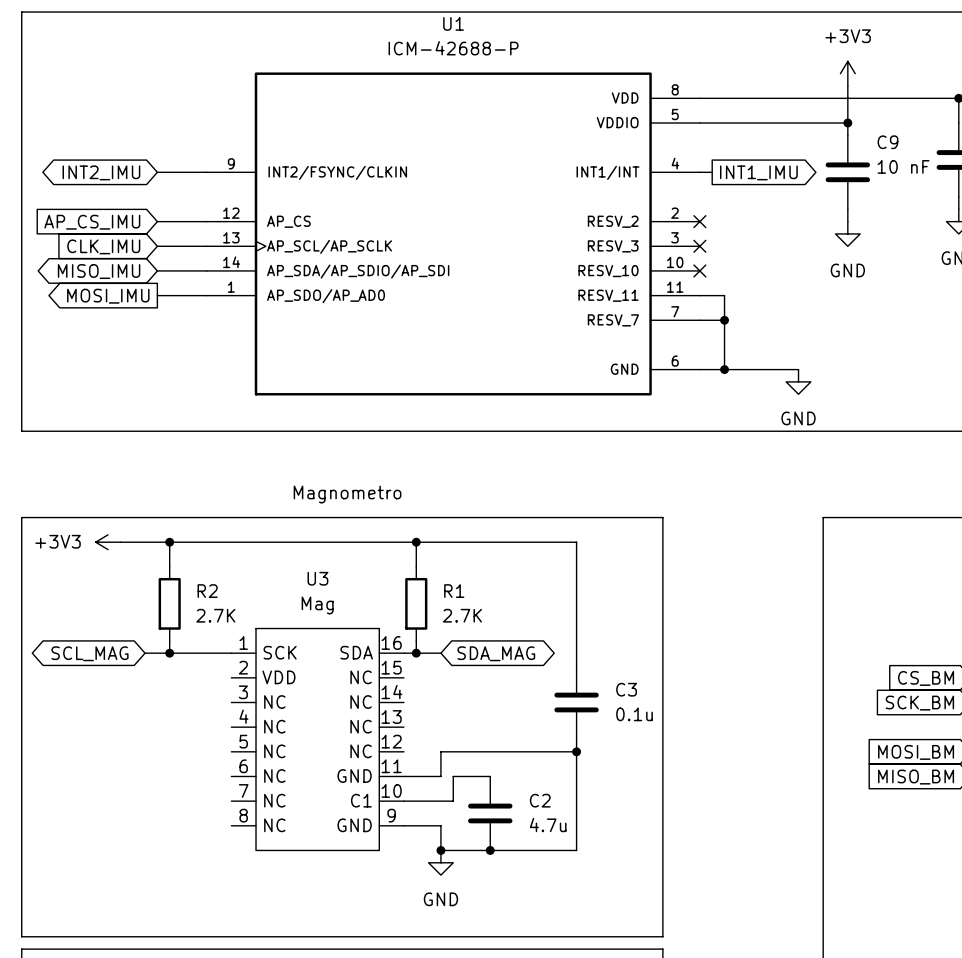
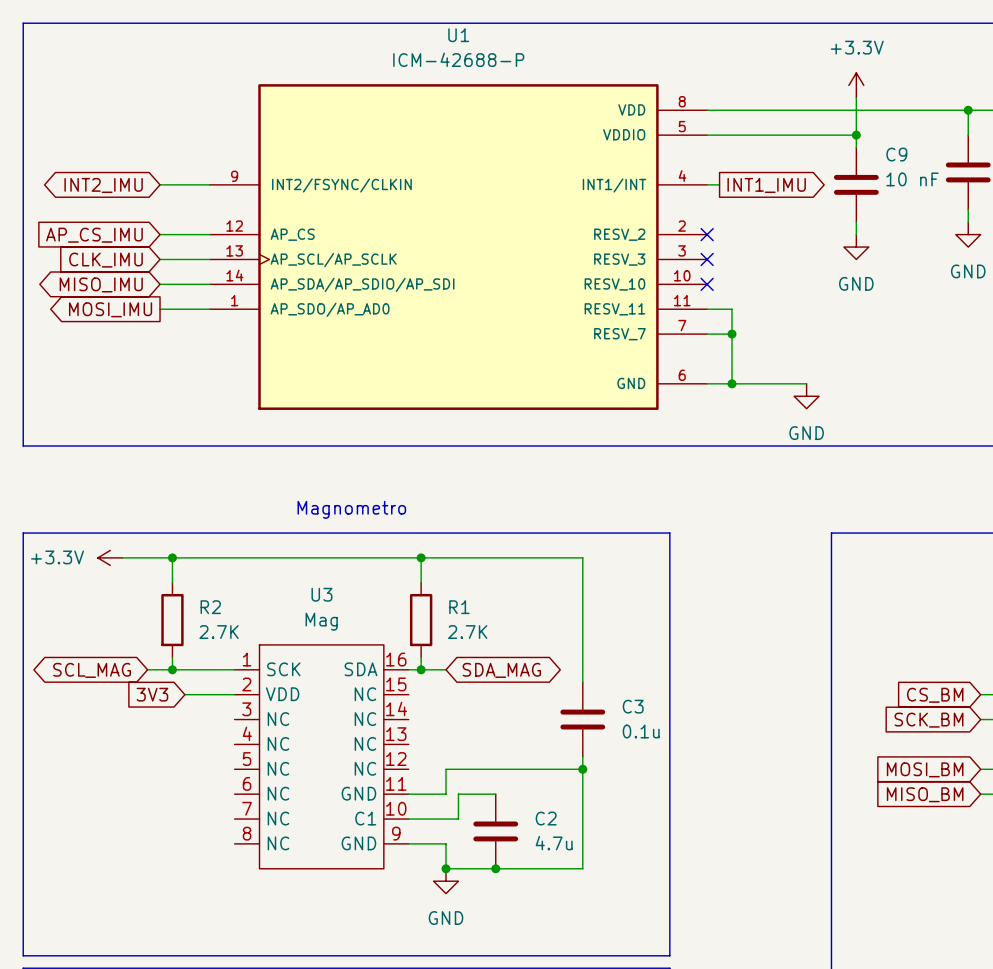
power symbol: +3V3 (847, 73) -> +3.3V (856, 85)
power symbol: +3V3 (108, 542) -> +3.3V (110, 557)
global label: none -> 3V3 (152, 694)
wire: none -> (184, 694) (234, 694)

